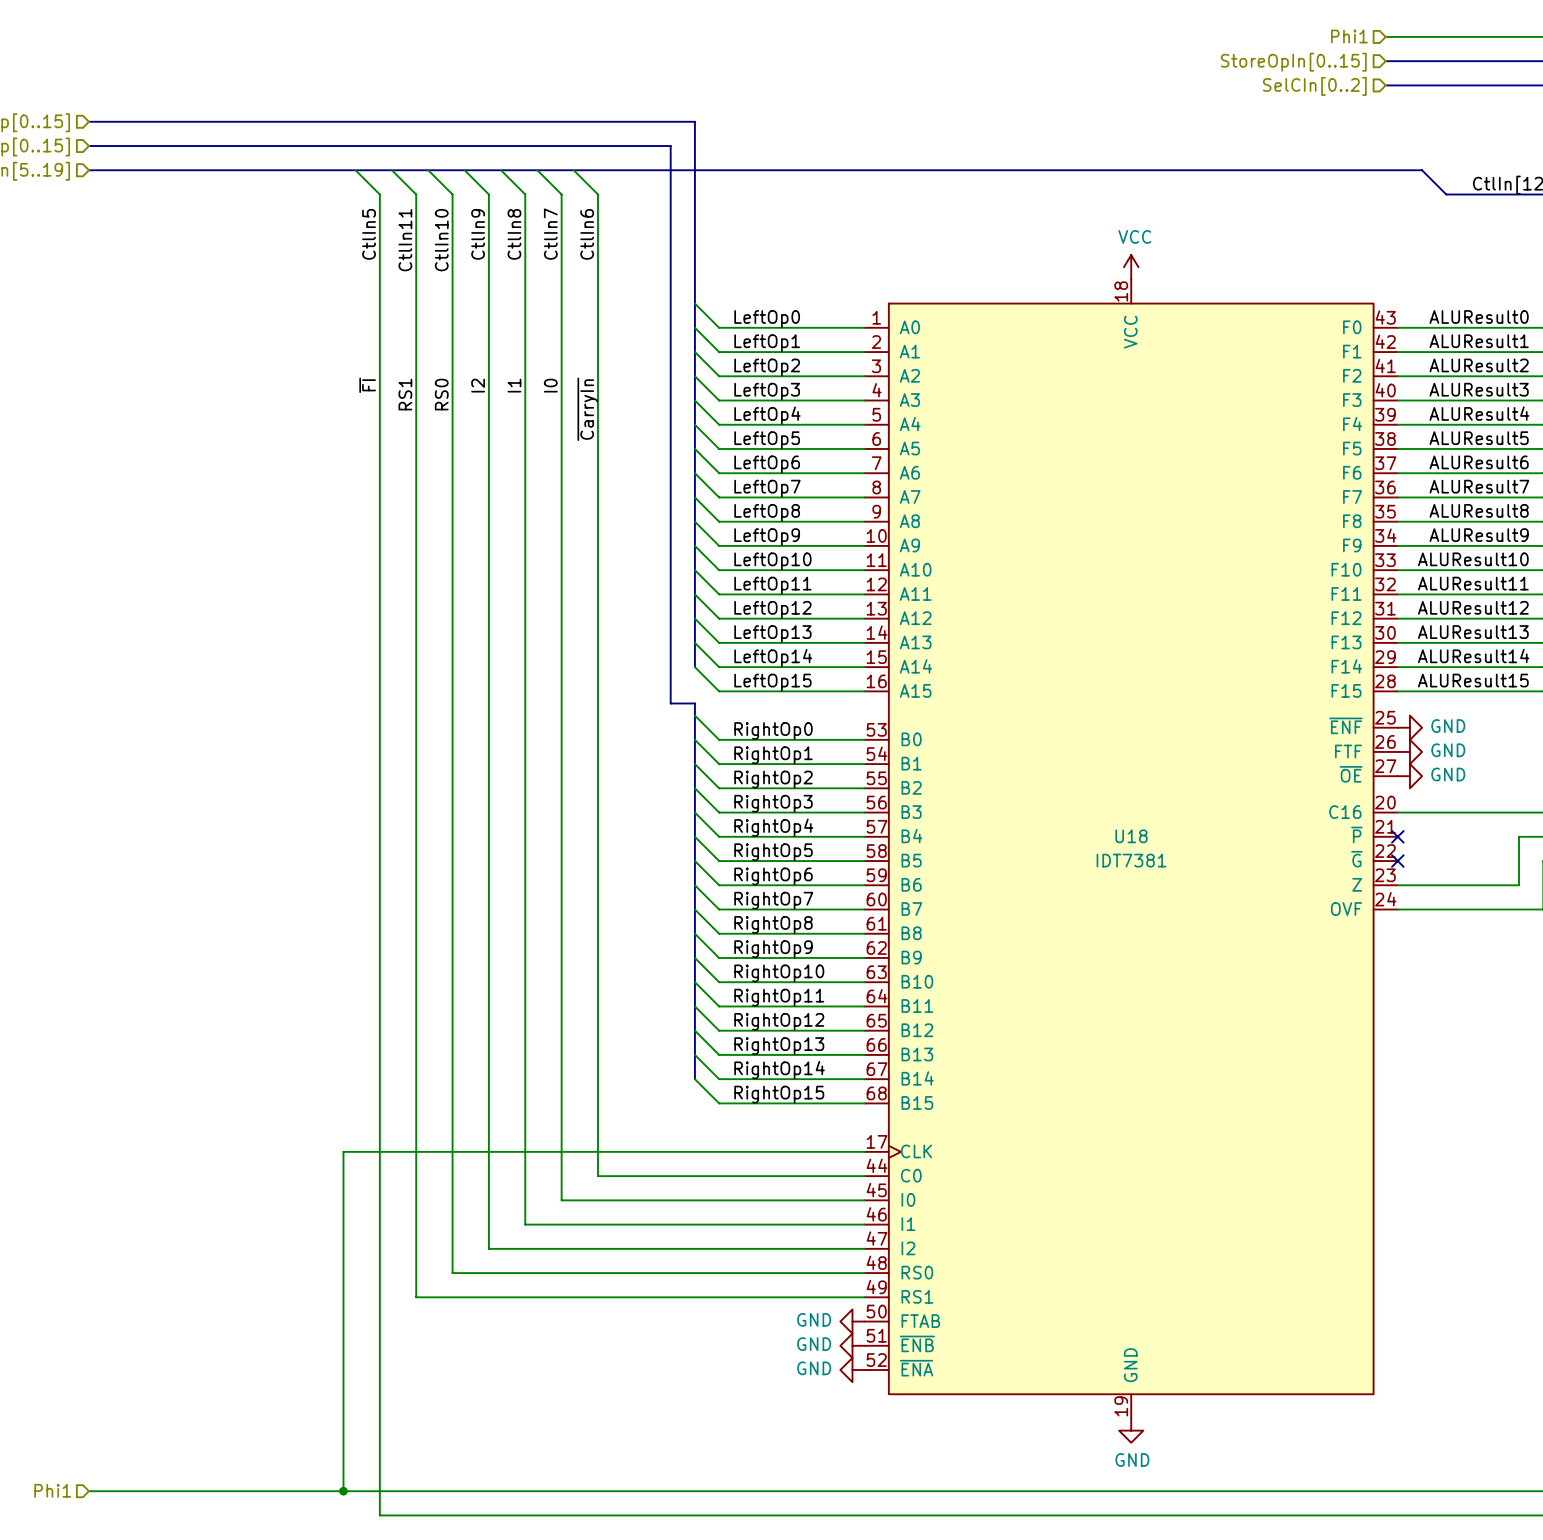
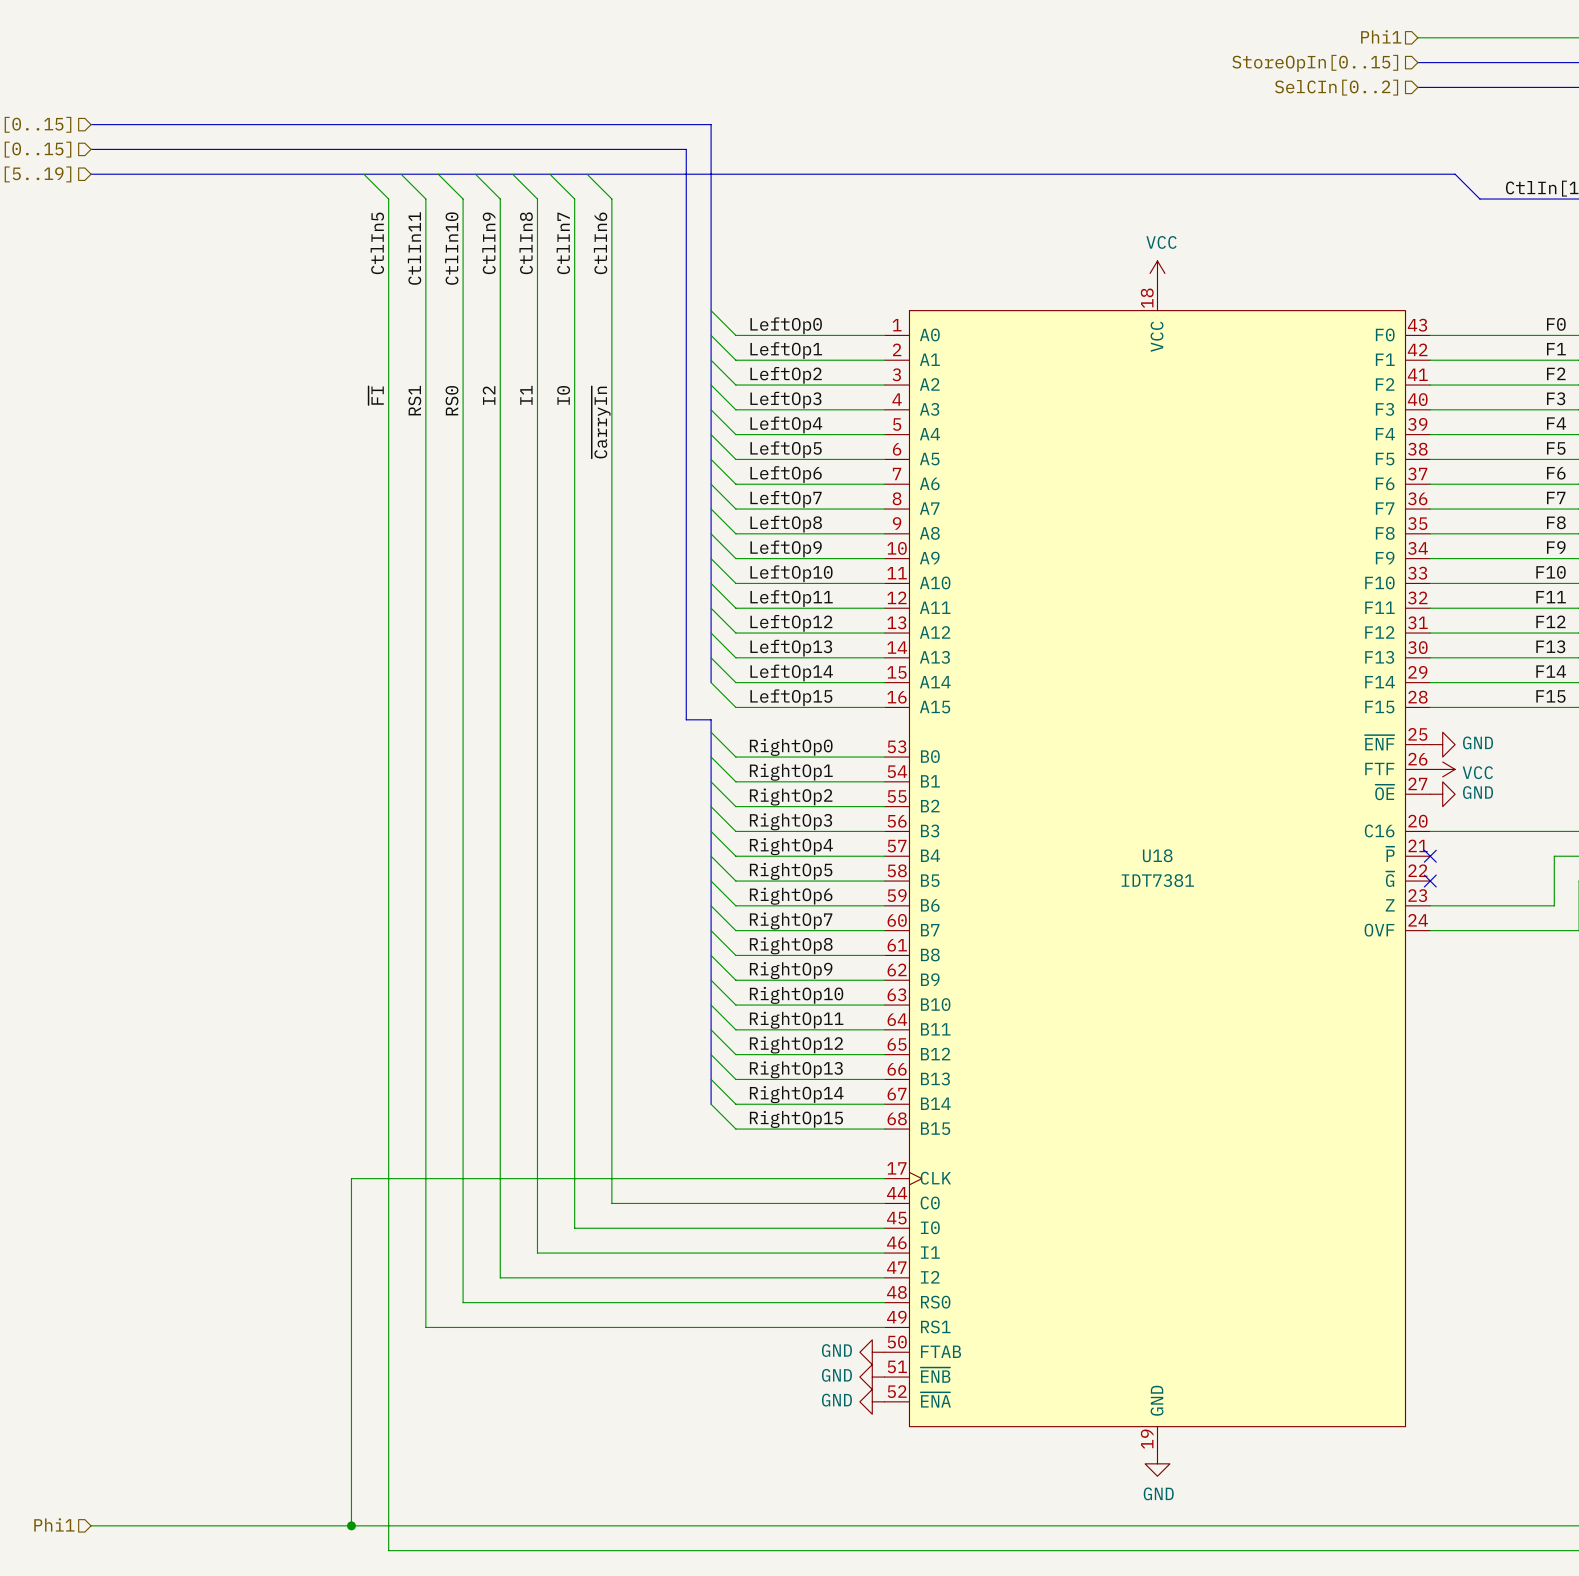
label: ALUResult0 (1479, 316) -> F0 (1556, 324)
label: ALUResult1 (1479, 341) -> F1 (1556, 349)
label: ALUResult2 (1479, 365) -> F2 (1556, 373)
label: ALUResult3 (1479, 389) -> F3 (1556, 398)
label: ALUResult4 (1479, 413) -> F4 (1556, 423)
label: ALUResult5 (1479, 438) -> F5 (1556, 448)
label: ALUResult6 (1479, 462) -> F6 (1556, 473)
label: ALUResult7 (1479, 486) -> F7 (1556, 497)
label: ALUResult8 (1479, 510) -> F8 (1556, 522)
label: ALUResult9 (1479, 535) -> F9 (1556, 547)
label: ALUResult10 (1473, 559) -> F10 (1551, 572)
label: ALUResult11 (1473, 583) -> F11 (1551, 597)
label: ALUResult12 (1473, 607) -> F12 (1550, 621)
label: ALUResult13 (1473, 632) -> F13 (1550, 646)
label: ALUResult14 (1473, 656) -> F14 (1551, 671)
label: ALUResult15 (1473, 680) -> F15 (1550, 696)
power symbol: GND (1409, 751) -> VCC (1442, 769)

